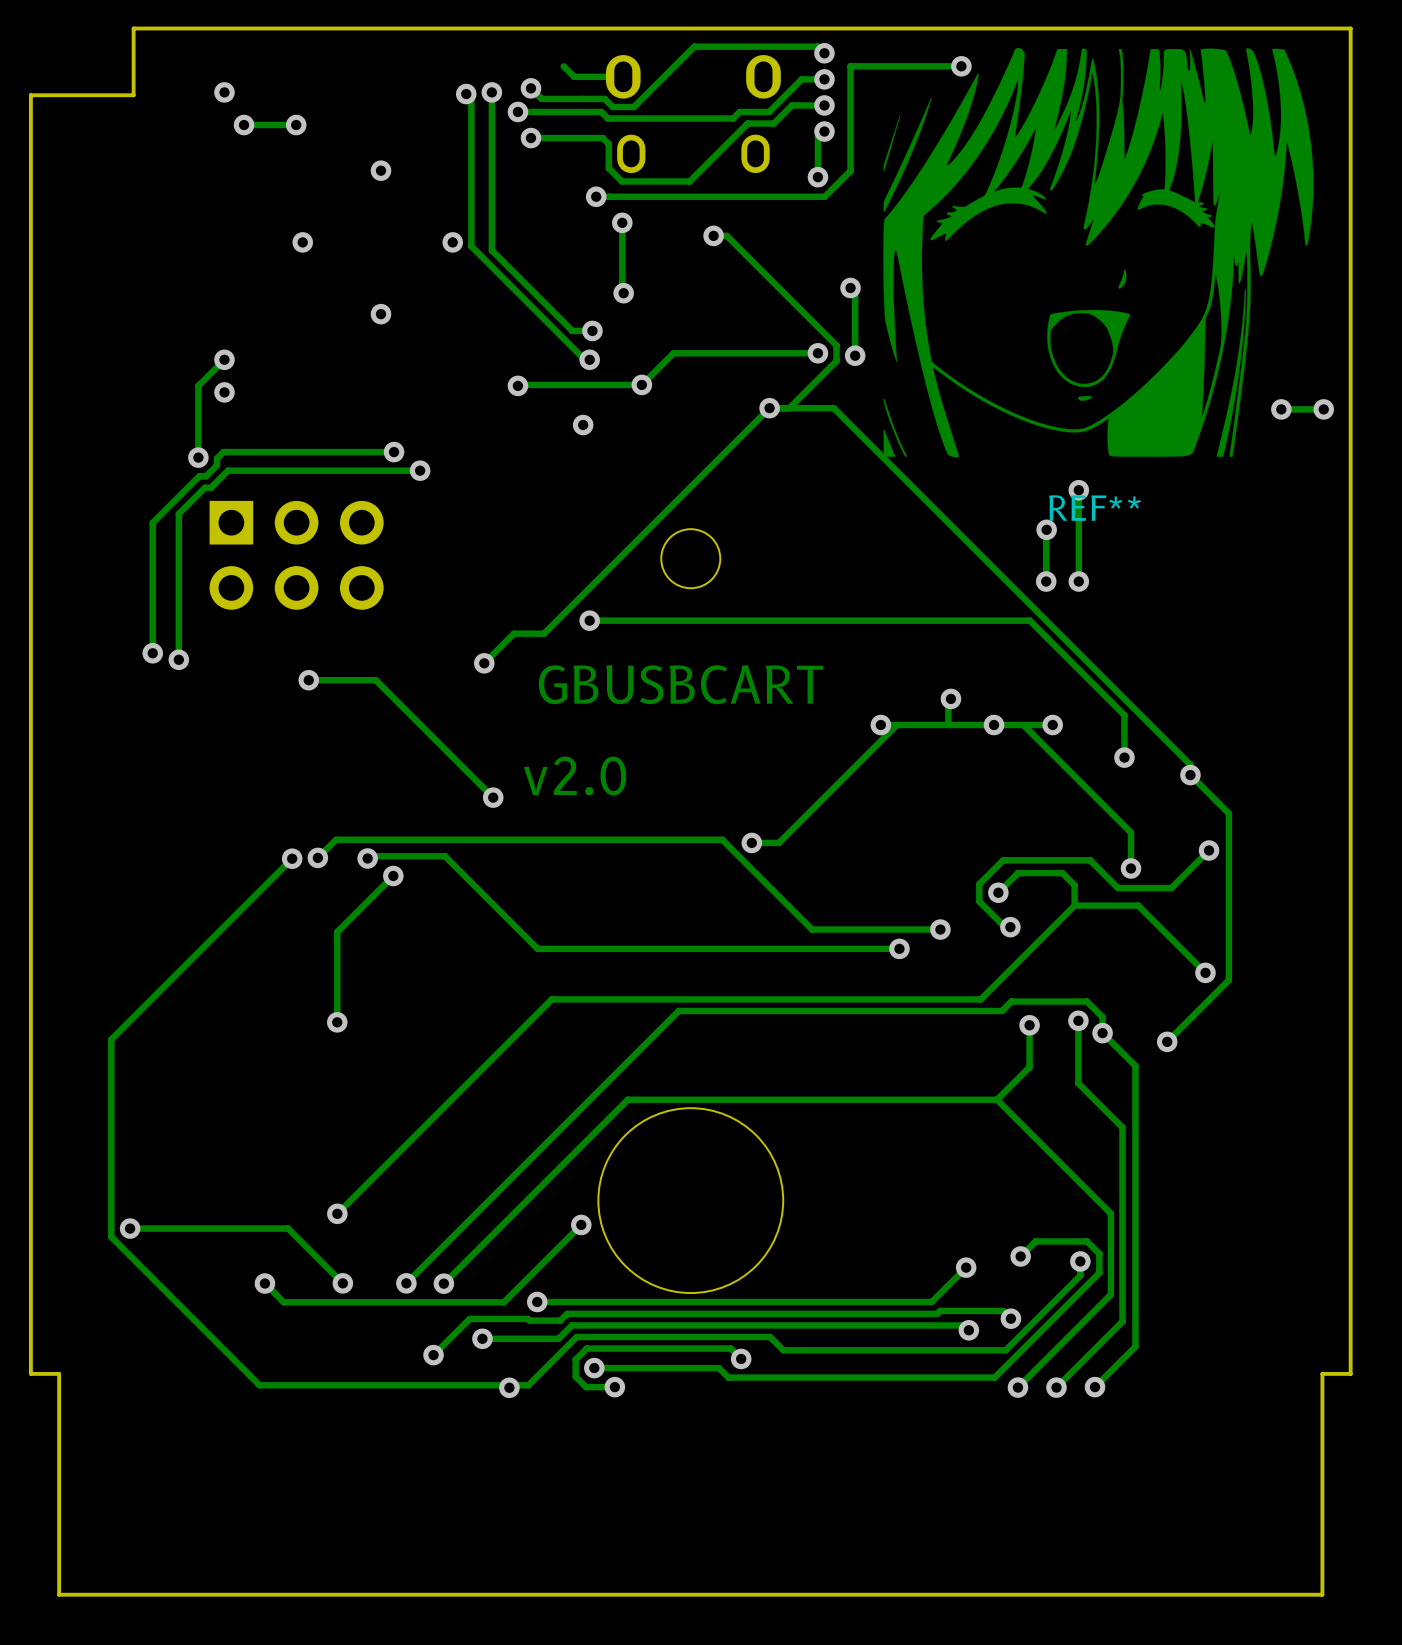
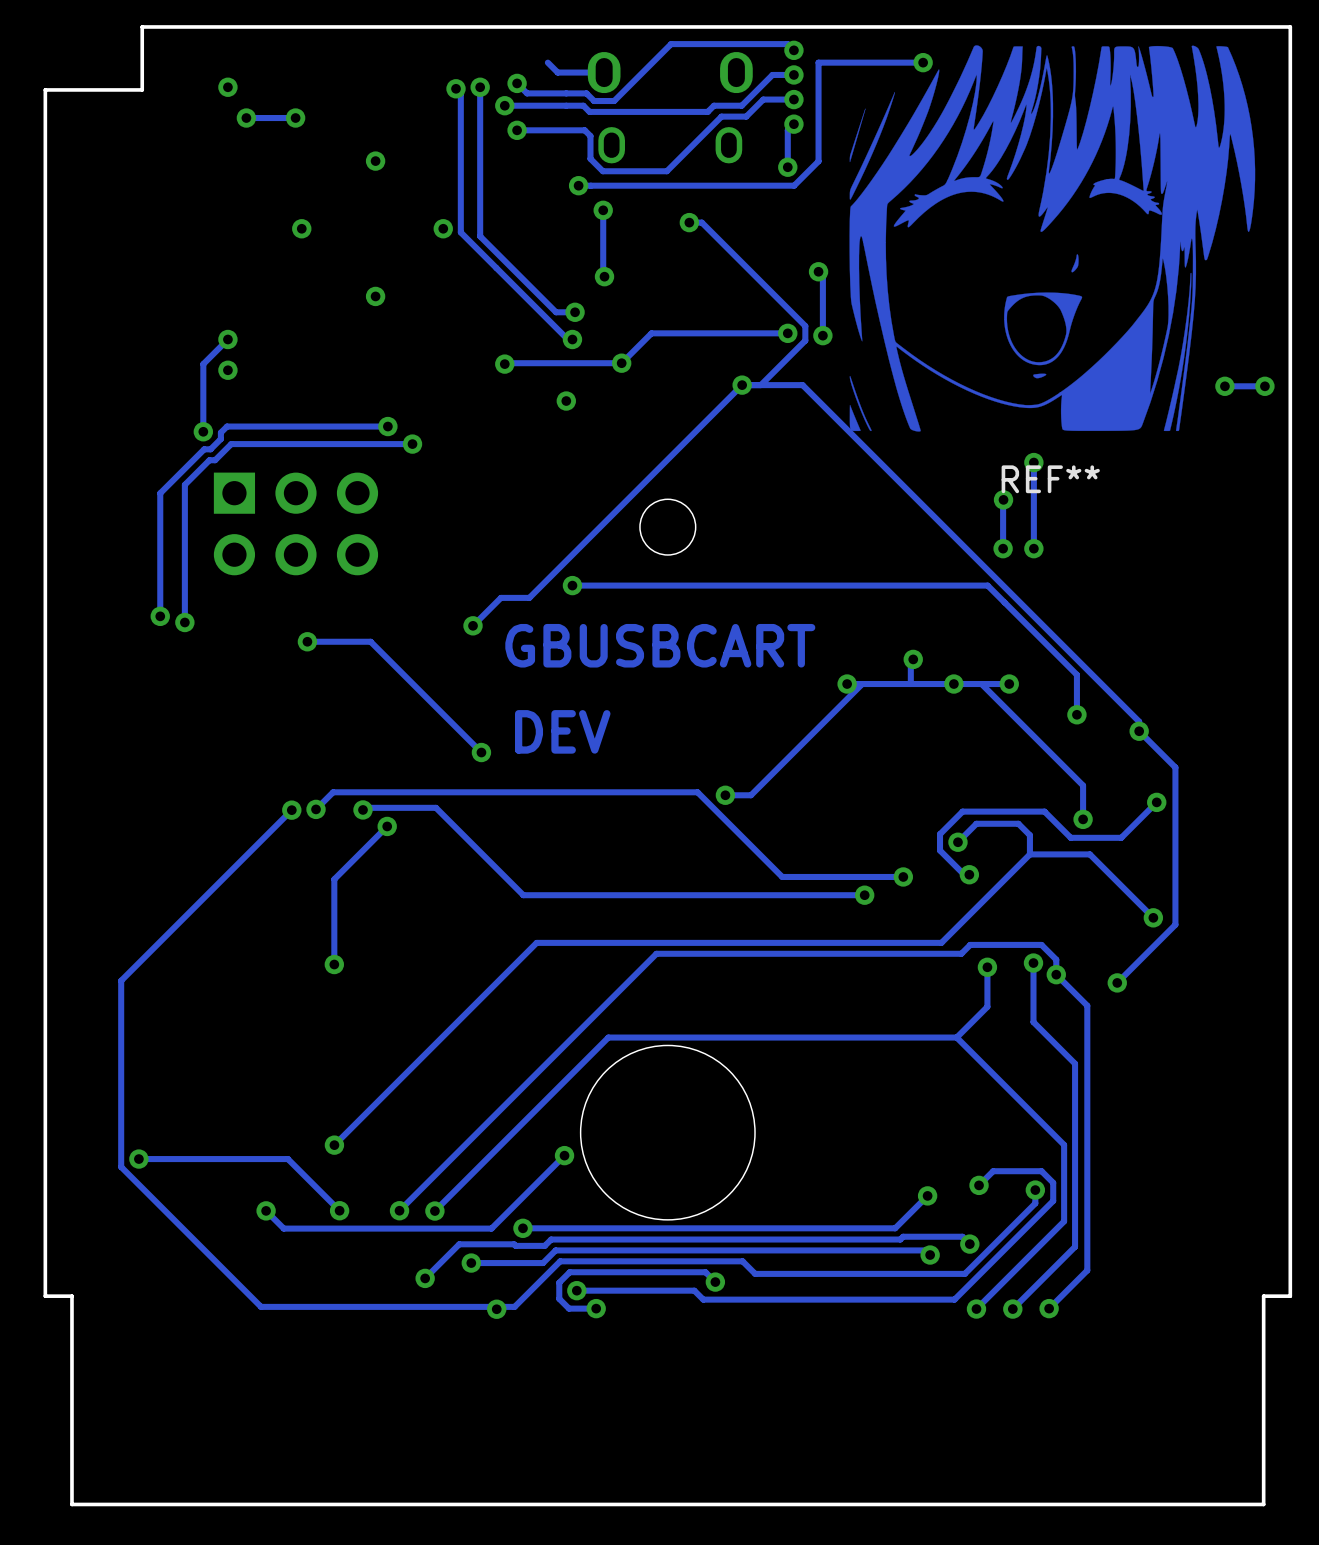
text: v2.0 (575, 776) -> DEV (562, 731)

